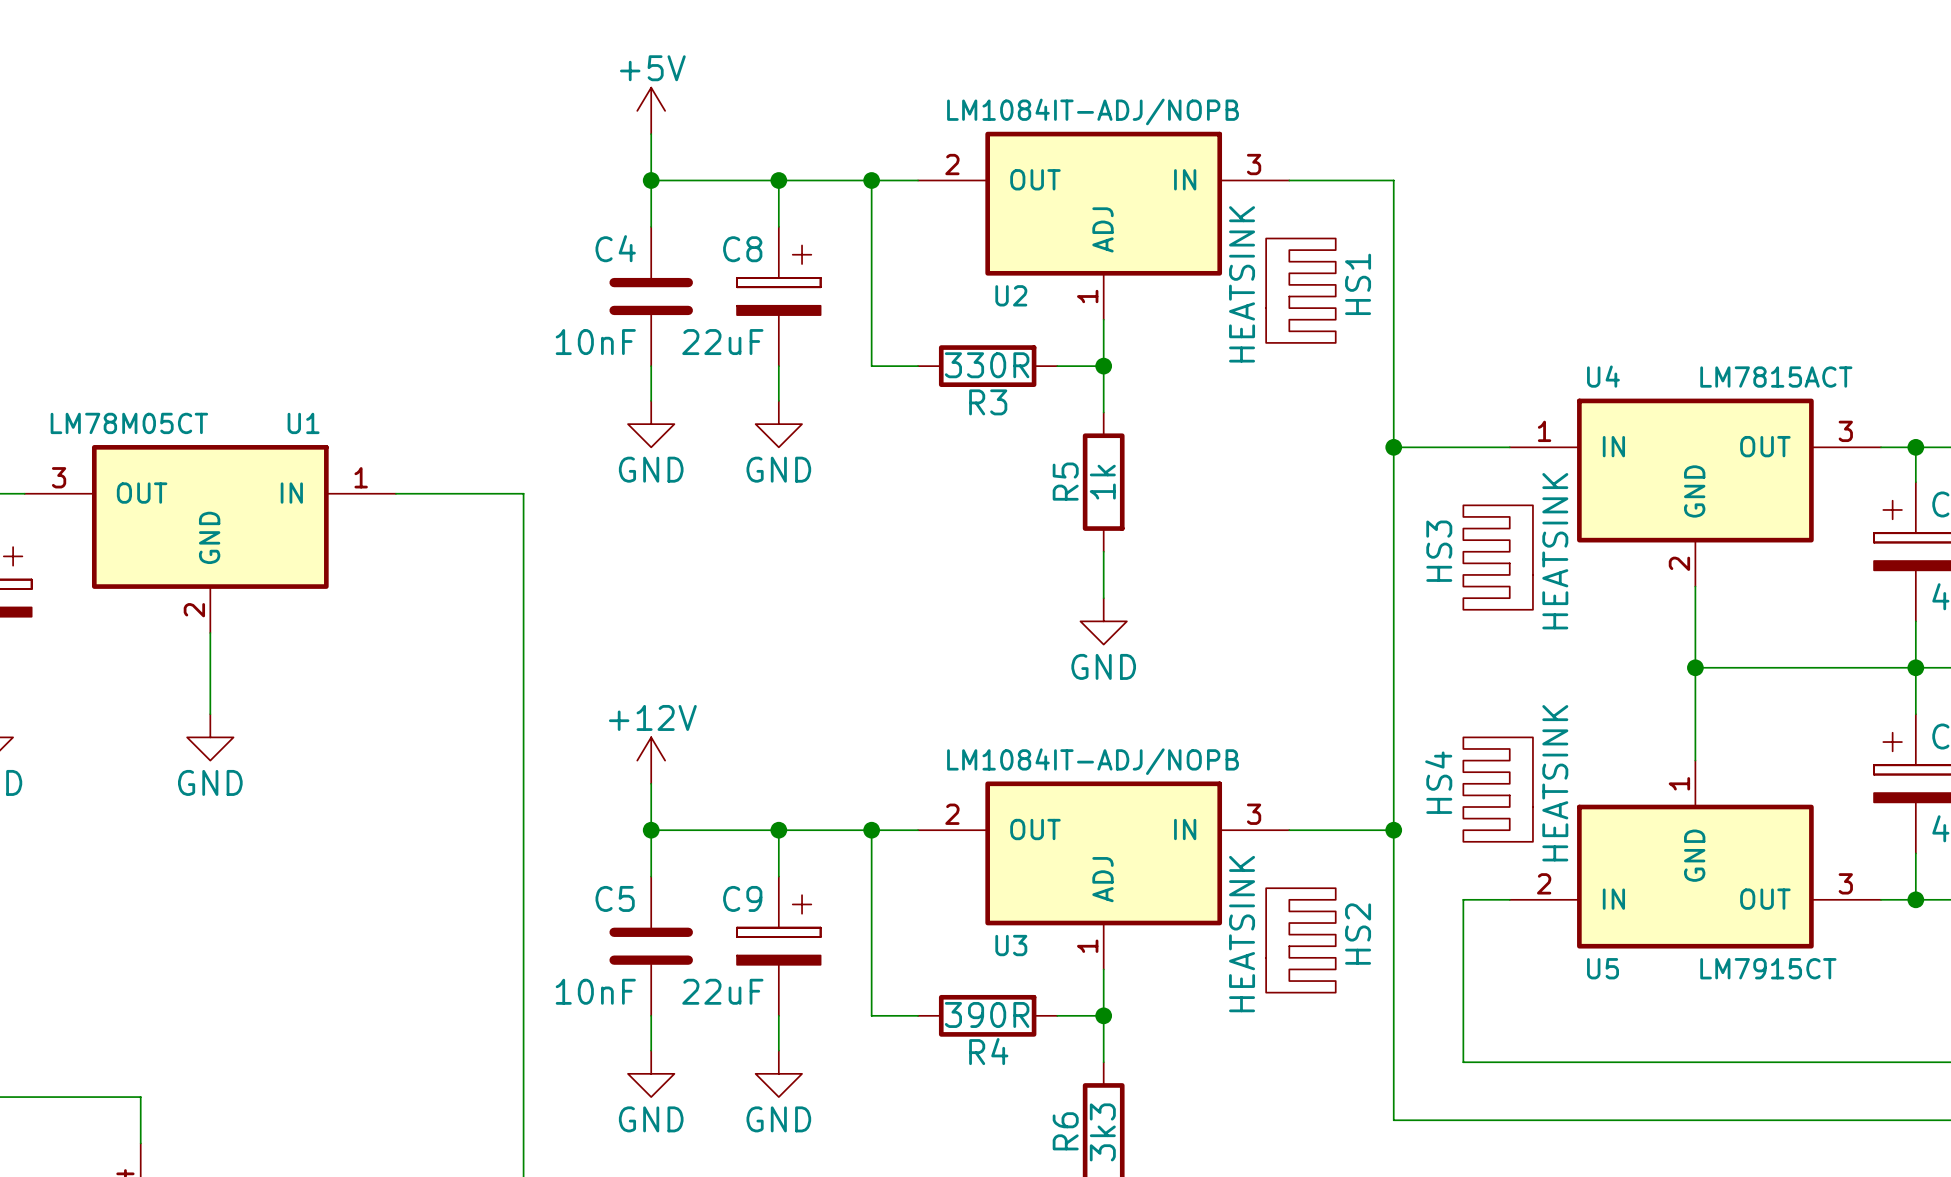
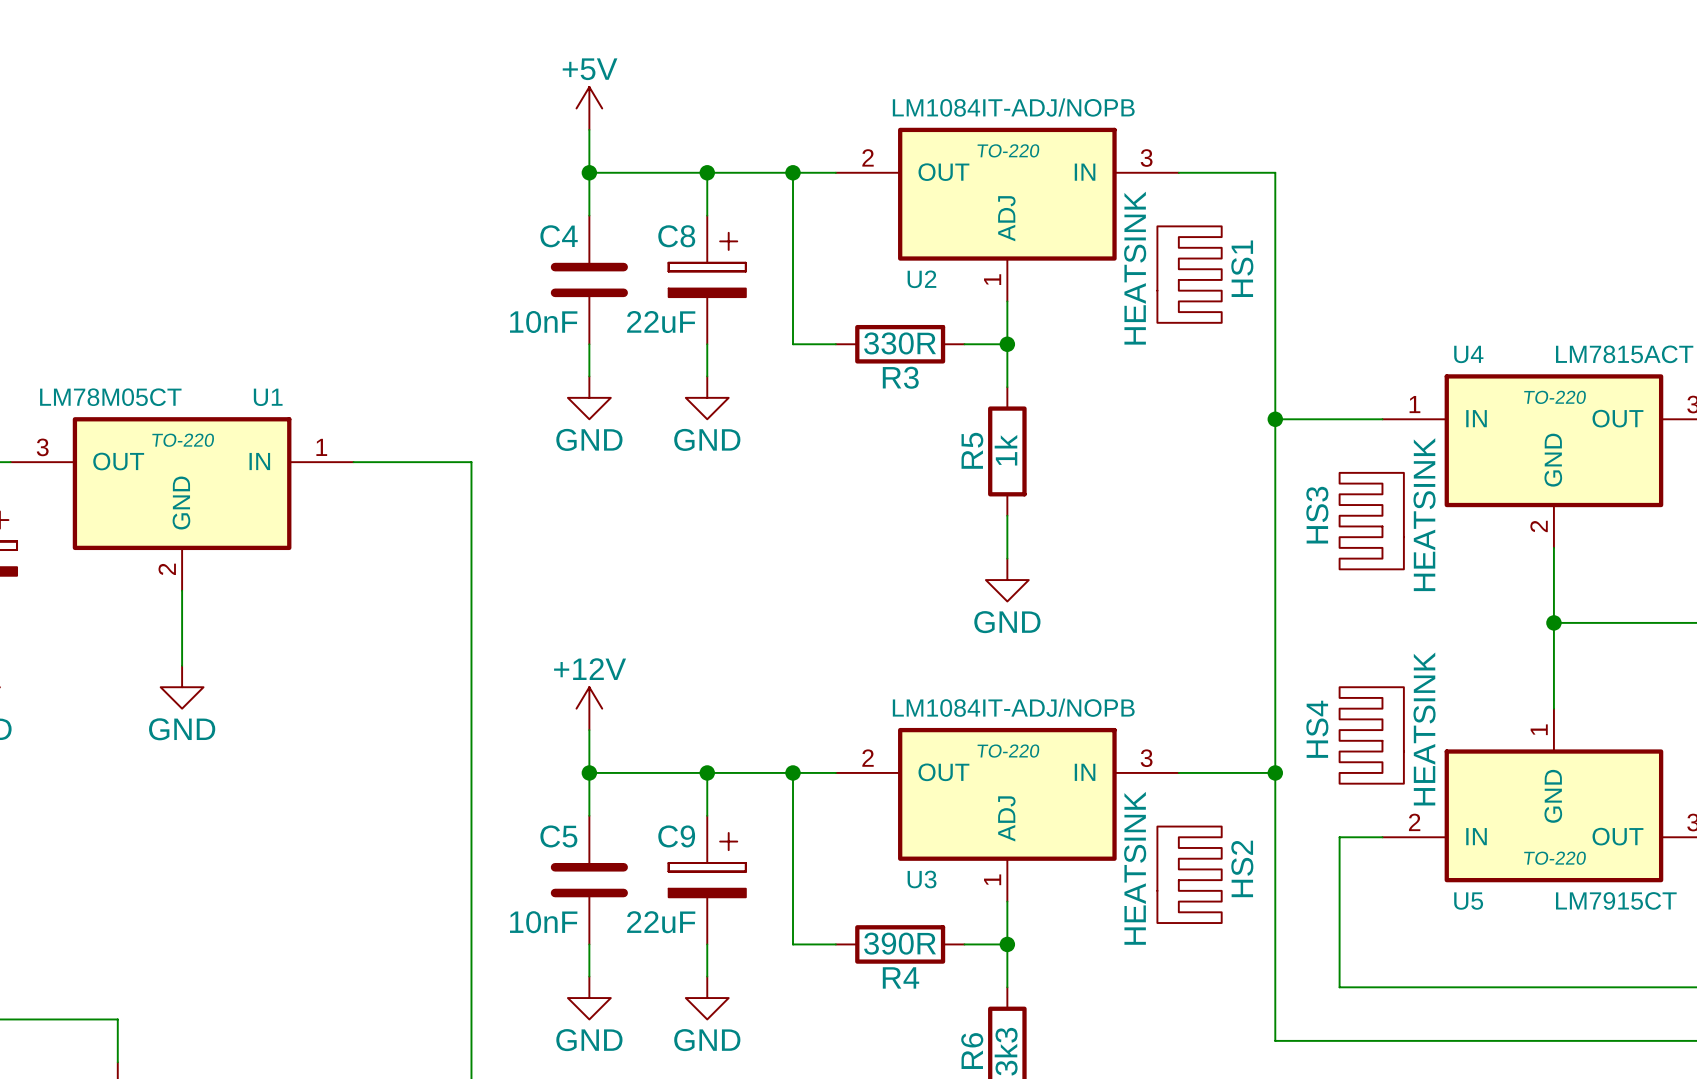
U2 text: none -> TO-220 (1008, 150)
U4 text: none -> TO-220 (1555, 397)
U1 text: none -> TO-220 (183, 440)
U3 text: none -> TO-220 (1008, 751)
U5 text: none -> TO-220 (1555, 858)

